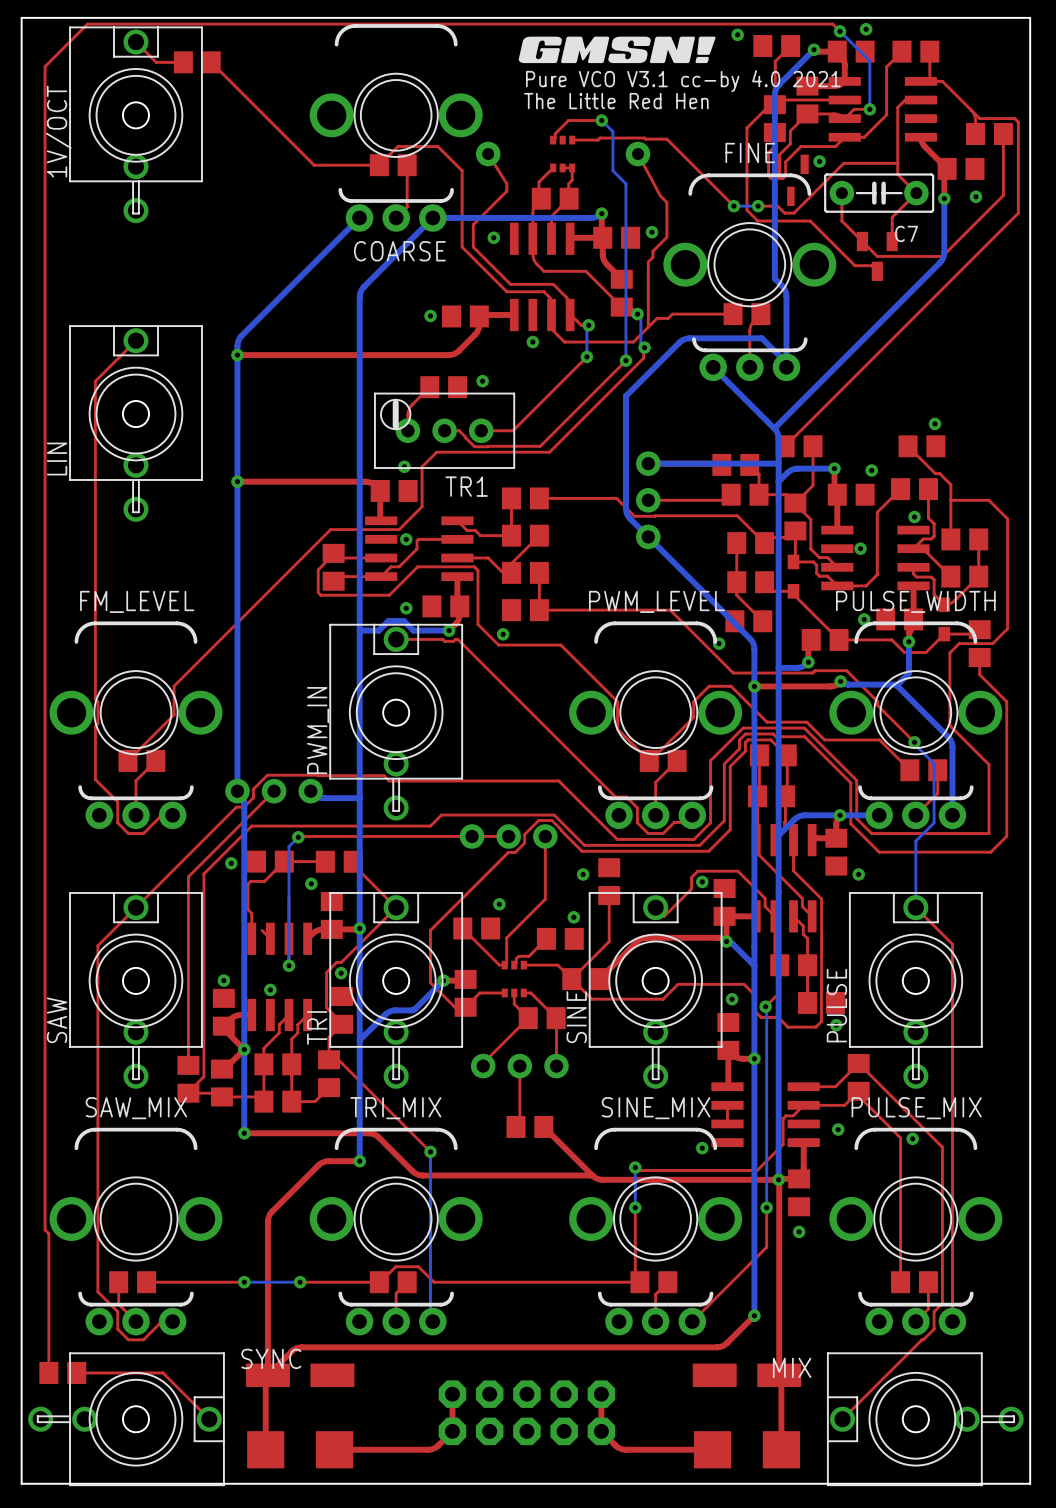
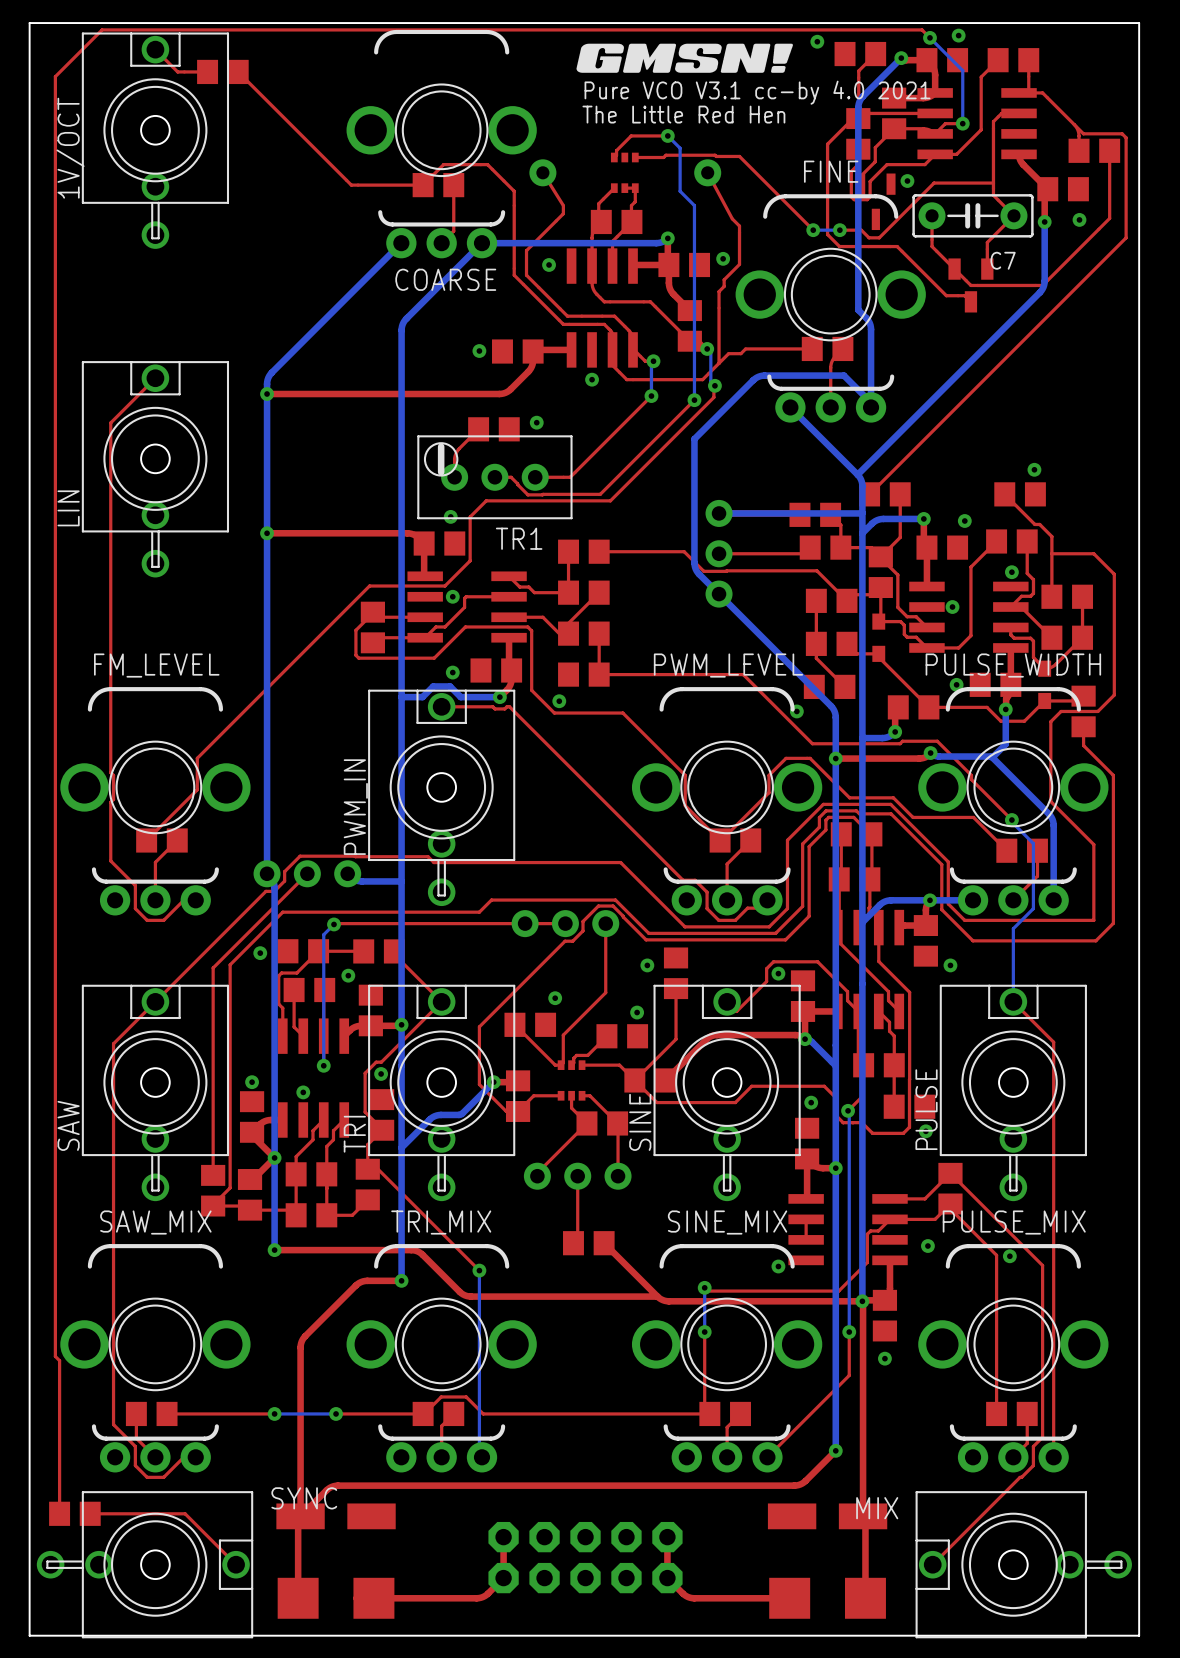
top track: none -> (294, 990) (294, 1026)
part: none -> (309, 990)

